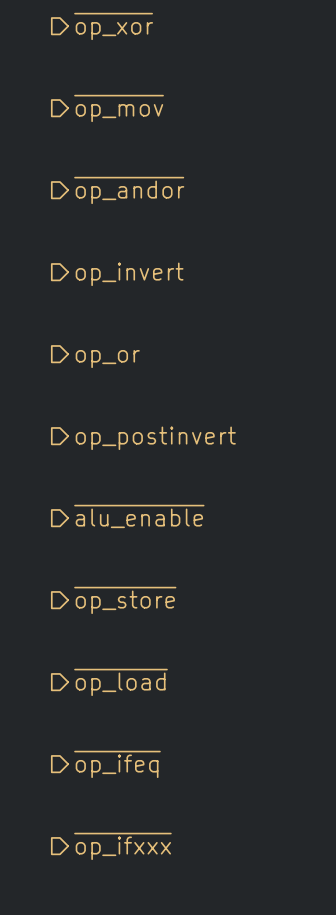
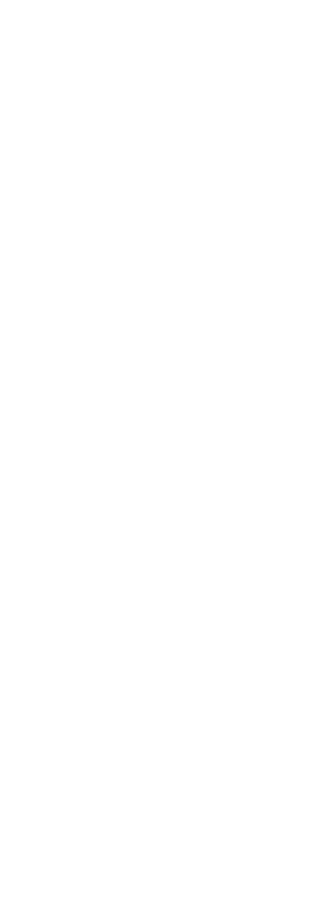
hierarchical label: ~{op_xor} (113, 26) -> none
hierarchical label: ~{op_mov} (119, 108) -> none
hierarchical label: ~{op_andor} (129, 190) -> none
hierarchical label: op_invert (129, 274) -> none
hierarchical label: op_or (107, 359) -> none
hierarchical label: op_postinvert (155, 438) -> none
hierarchical label: ~{alu_enable} (139, 516) -> none
hierarchical label: ~{op_store} (125, 600) -> none
hierarchical label: ~{op_load} (120, 682) -> none
hierarchical label: ~{op_ifeq} (117, 764) -> none
hierarchical label: ~{op_ifxxx} (122, 846) -> none

